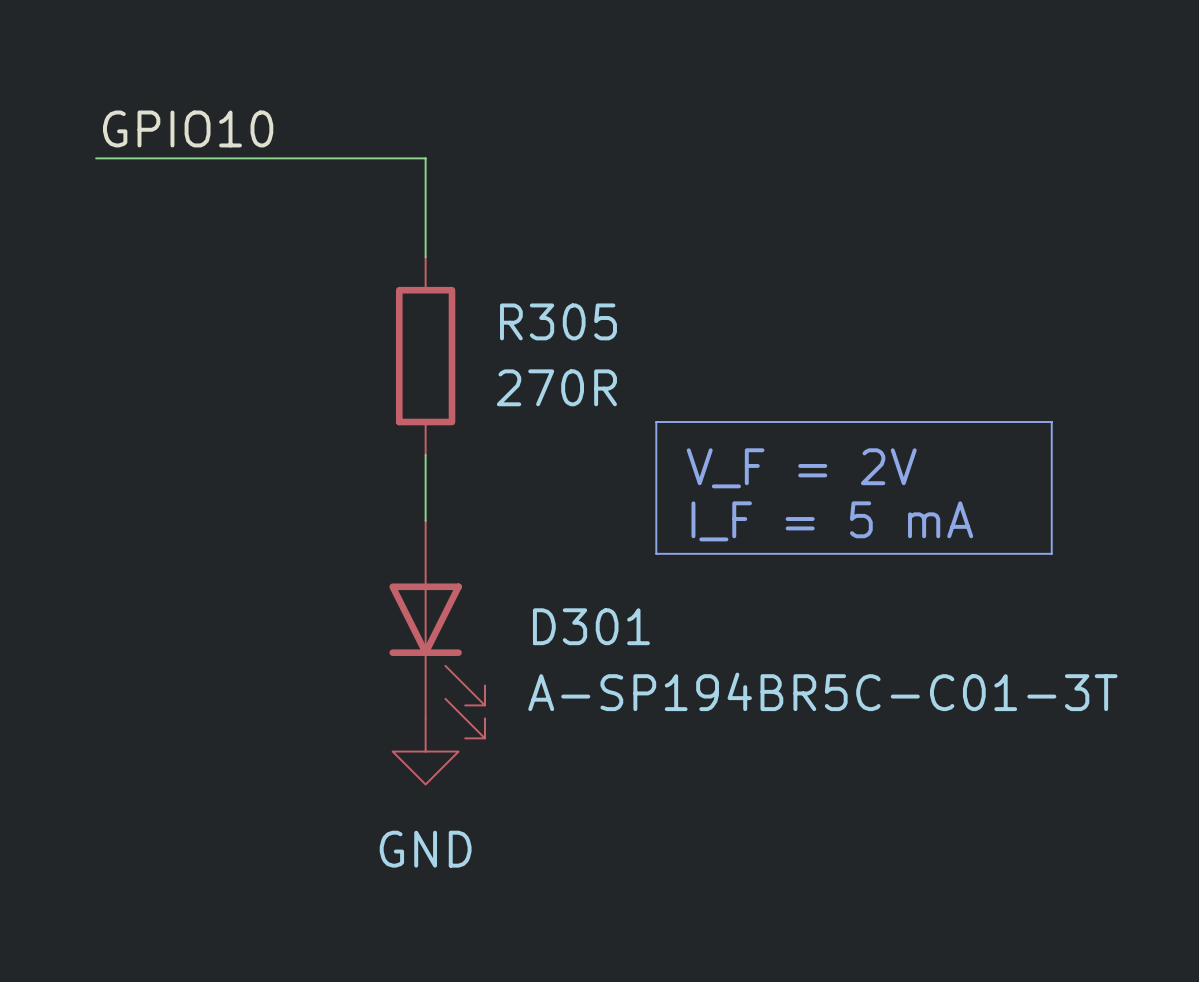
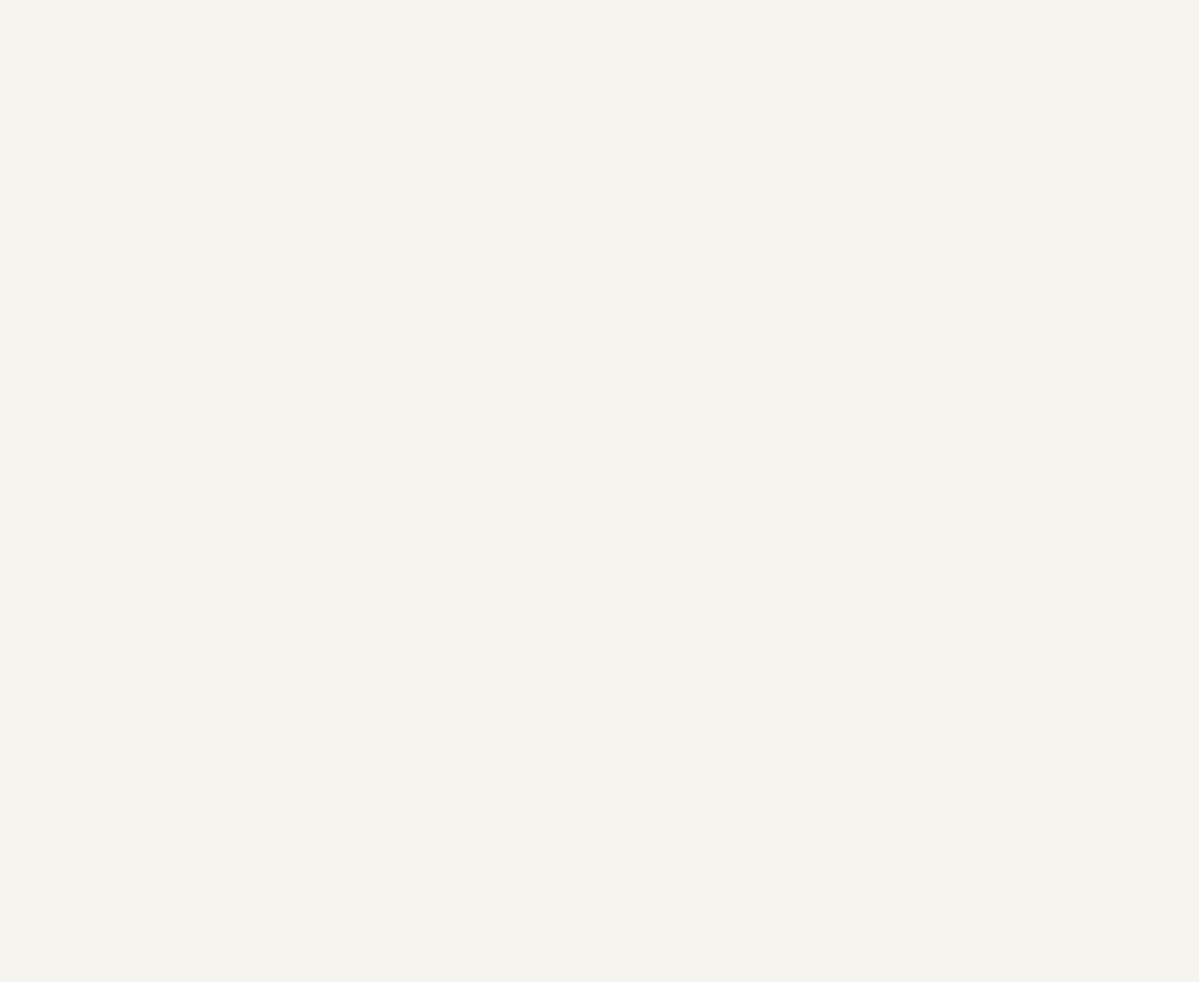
label: GPIO10 (188, 128) -> none
wire: (96, 158) (425, 158) (425, 257) -> none
R305: 270R (425, 356) -> none
line: (656, 422) (1051, 422) (1051, 553) (656, 553) (656, 422) -> none
wire: (425, 454) (425, 520) -> none
text: V_F = 2V (801, 468) -> none
text: I_F = 5 mA (832, 521) -> none
D301: A-SP194BR5C-C01-3T (437, 629) -> none
power symbol: GND (425, 751) -> none

